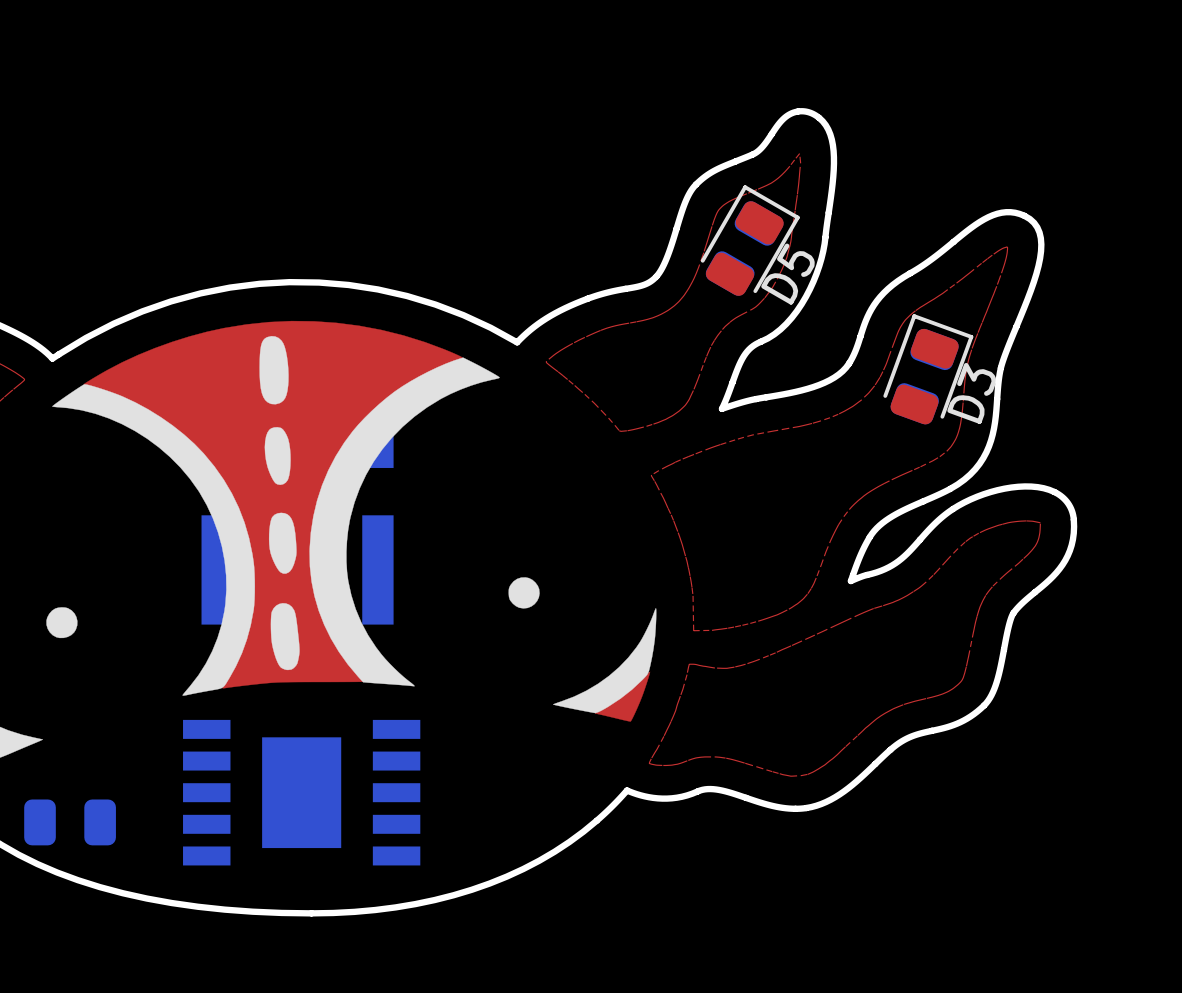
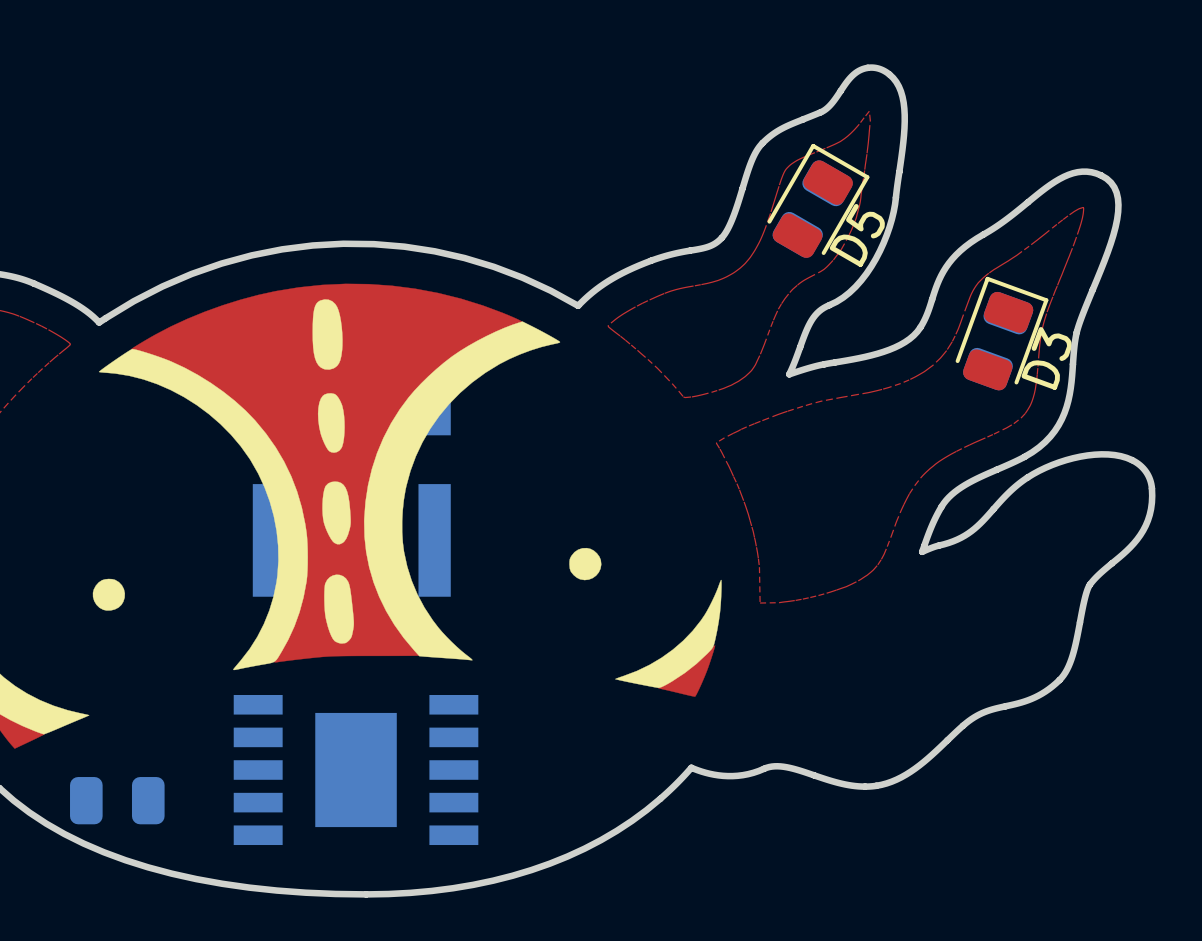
top zone outline: (649, 762) (675, 710) (689, 664) (726, 668) (768, 655) (865, 612) (907, 595) (925, 582) (965, 542) (978, 533) (1011, 522) (1026, 520) (1040, 522) (1038, 537) (1035, 545) (992, 586) (982, 600) (975, 622) (963, 677) (953, 688) (937, 695) (904, 704) (885, 713) (824, 764) (807, 774) (791, 776) (733, 759) (715, 756) (696, 757) (671, 765) (649, 763) -> none

